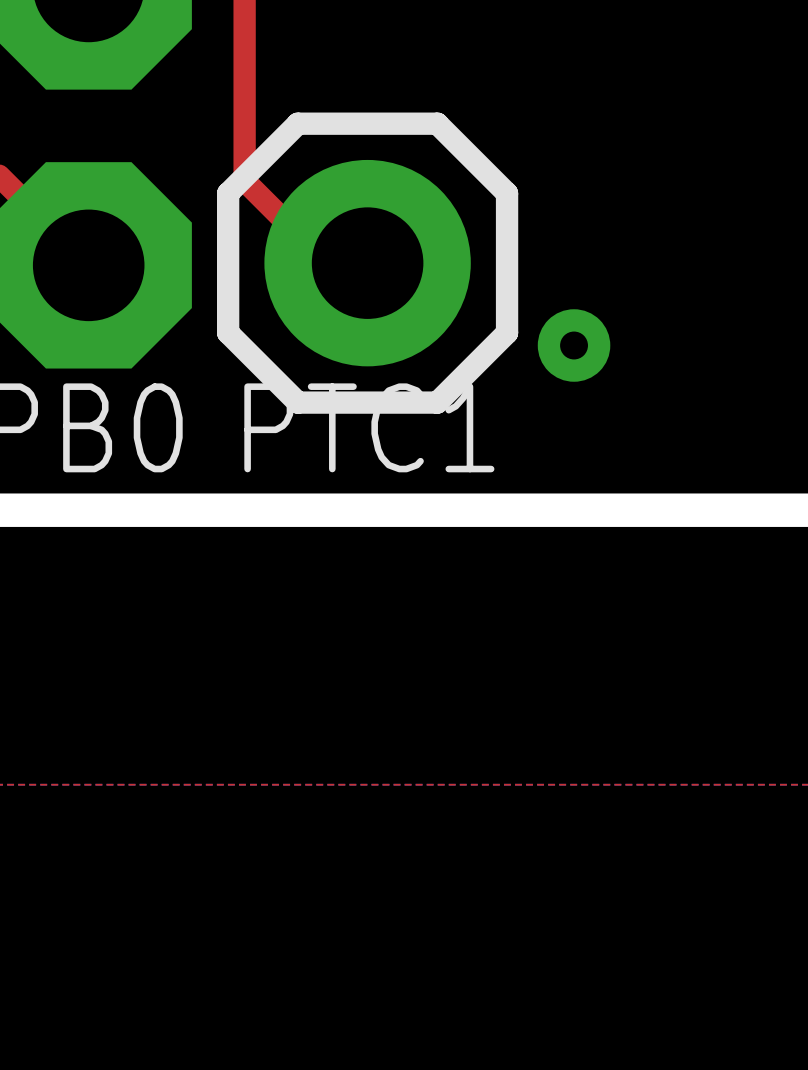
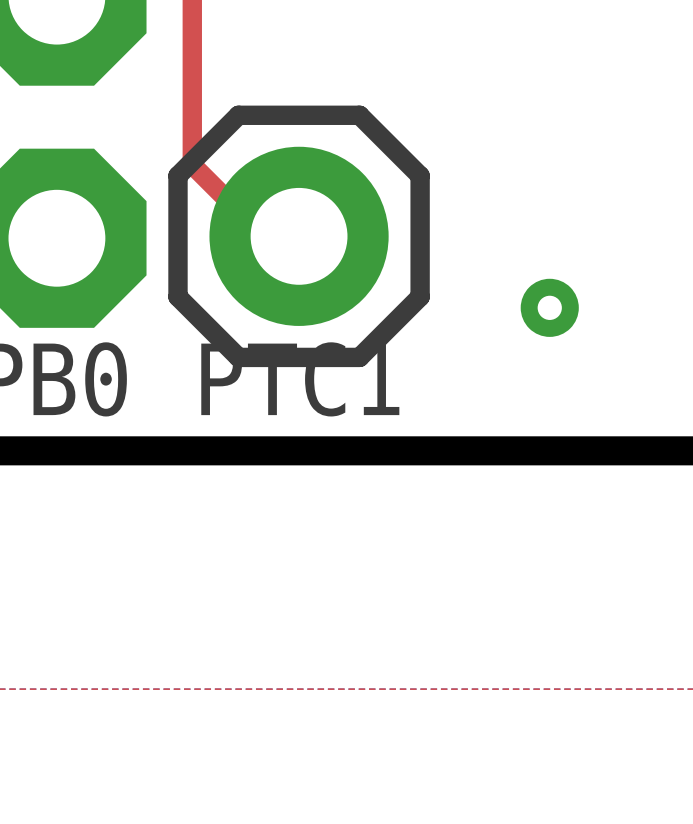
via: (574, 345) -> none
via: none -> (549, 307)

